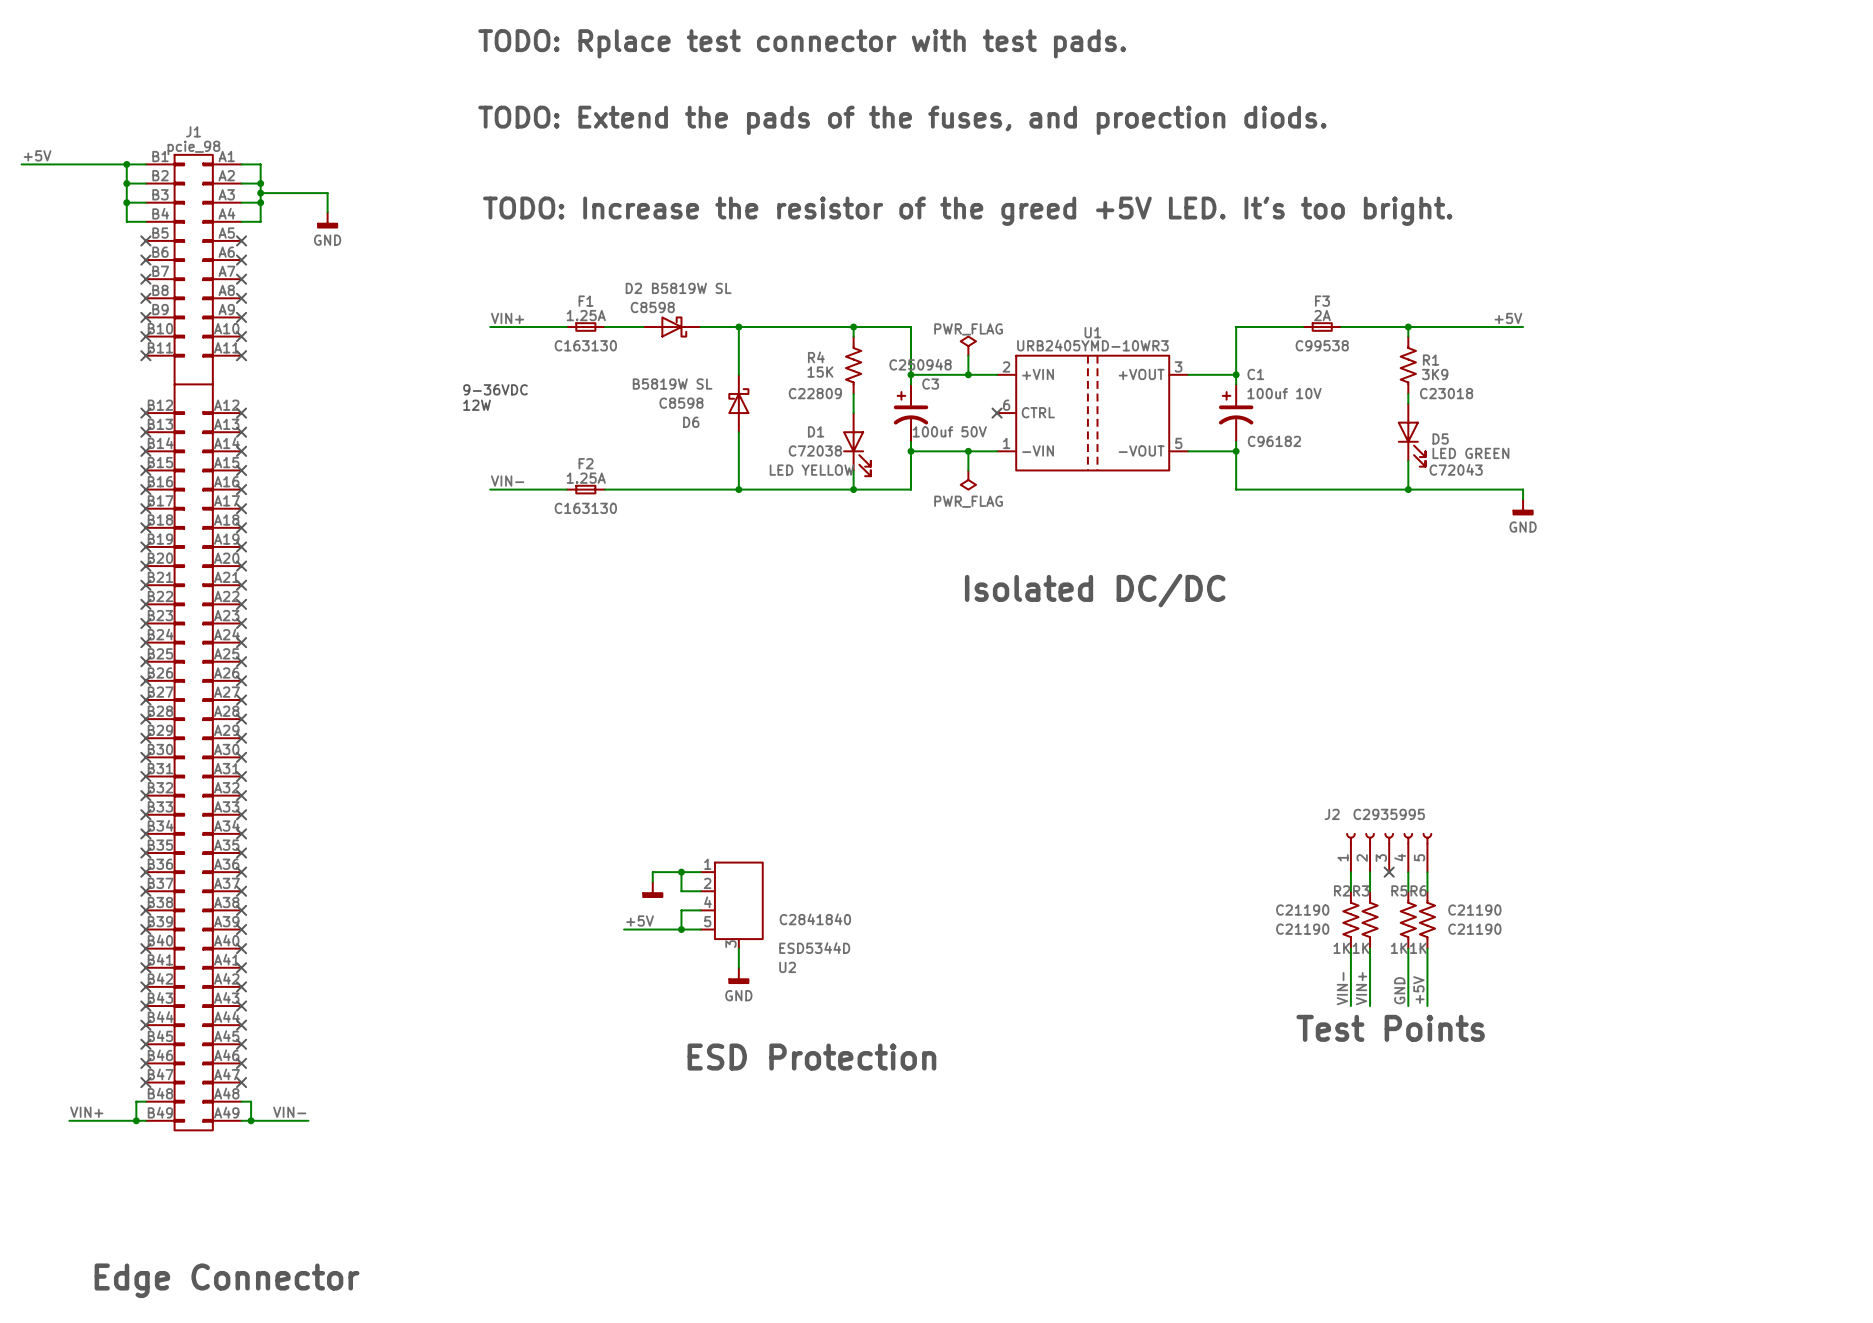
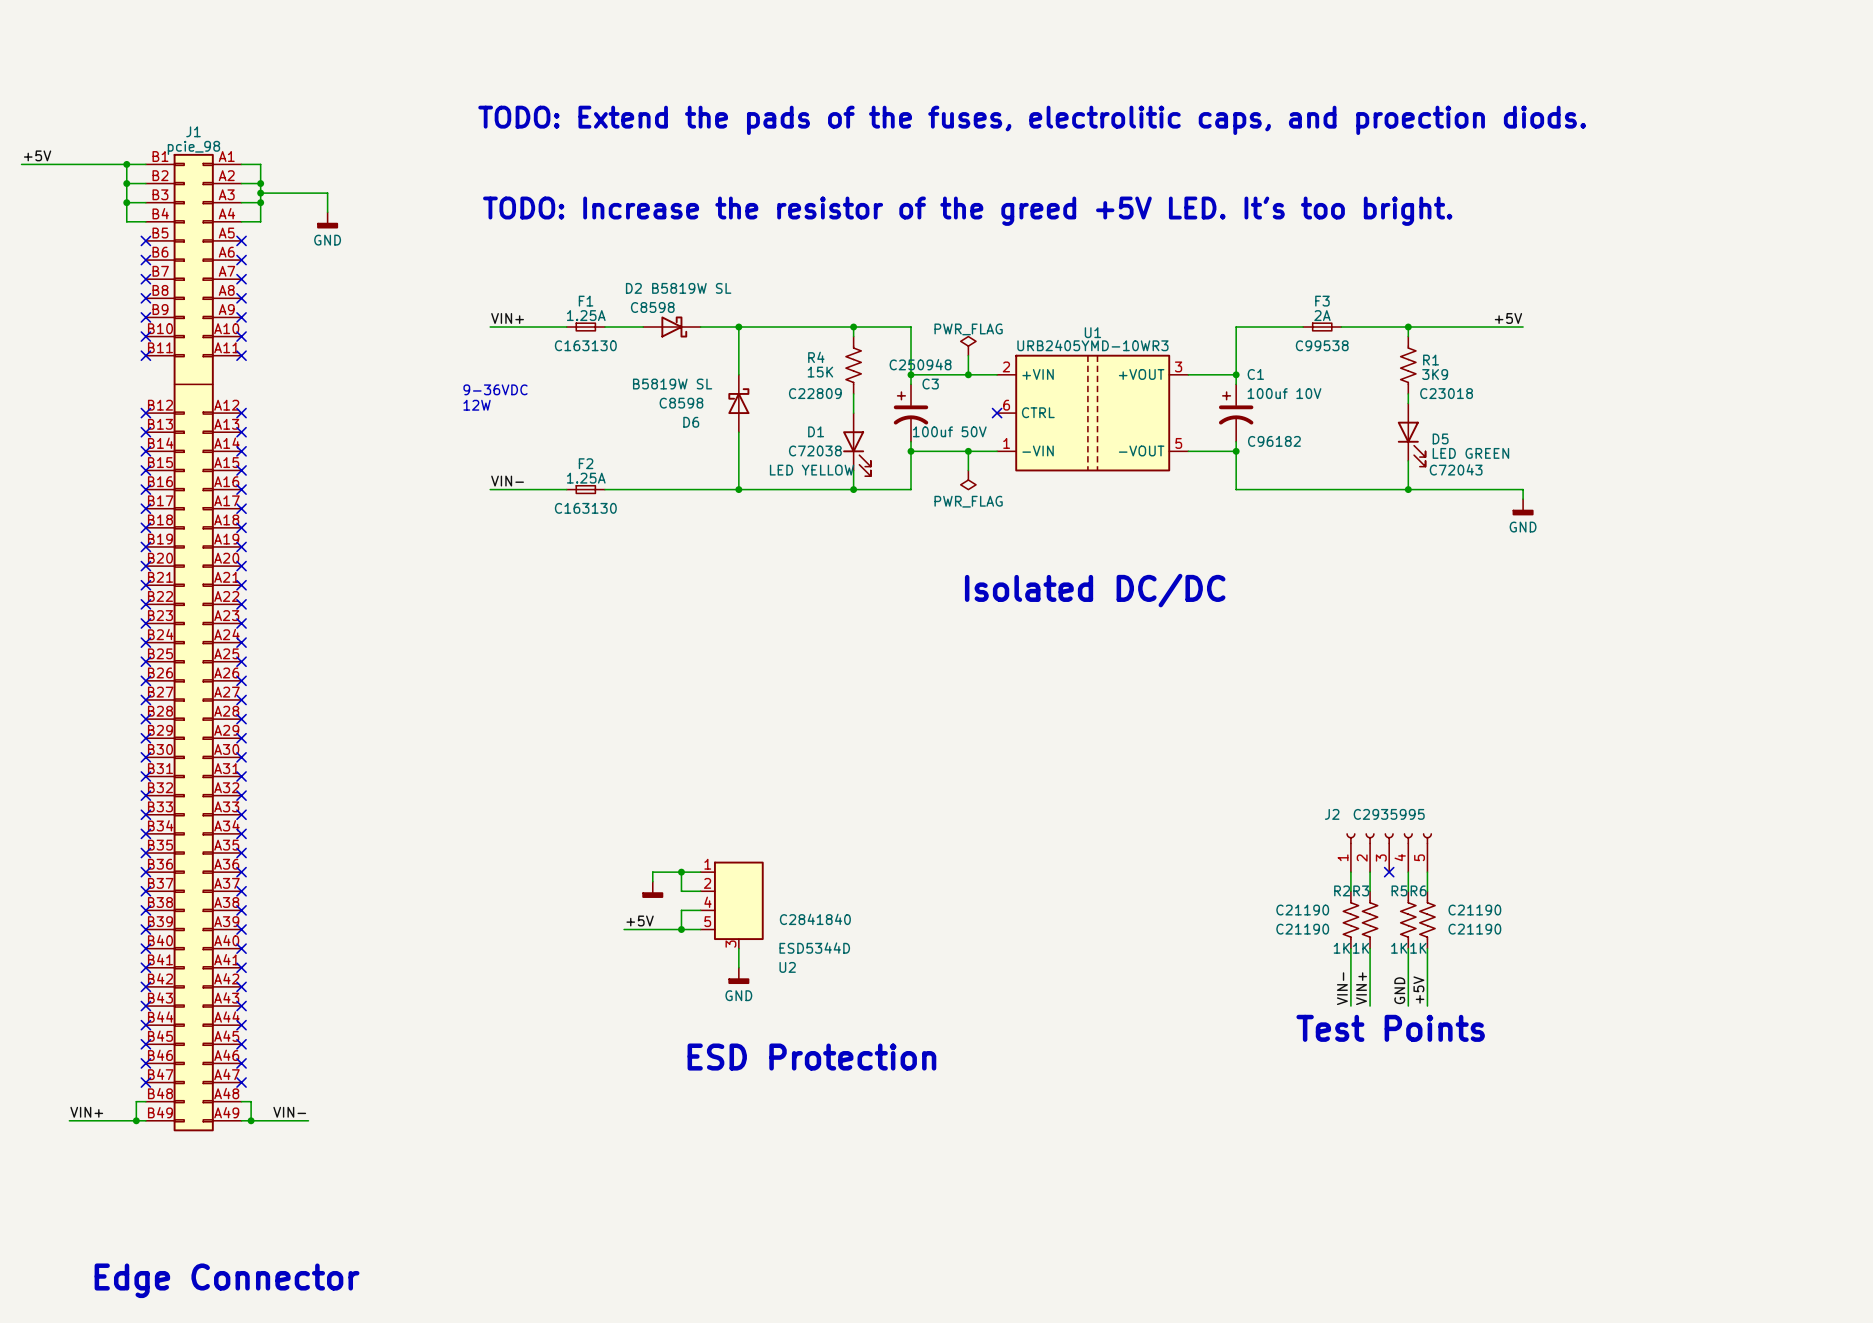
text: TODO: Rplace test connector with test pads. (802, 43) -> none
text: TODO: Extend the pads of the fuses, and proection diods. (902, 120) -> TODO: Extend the pads of the fuses, electrolitic caps, and proection diods. (1032, 120)

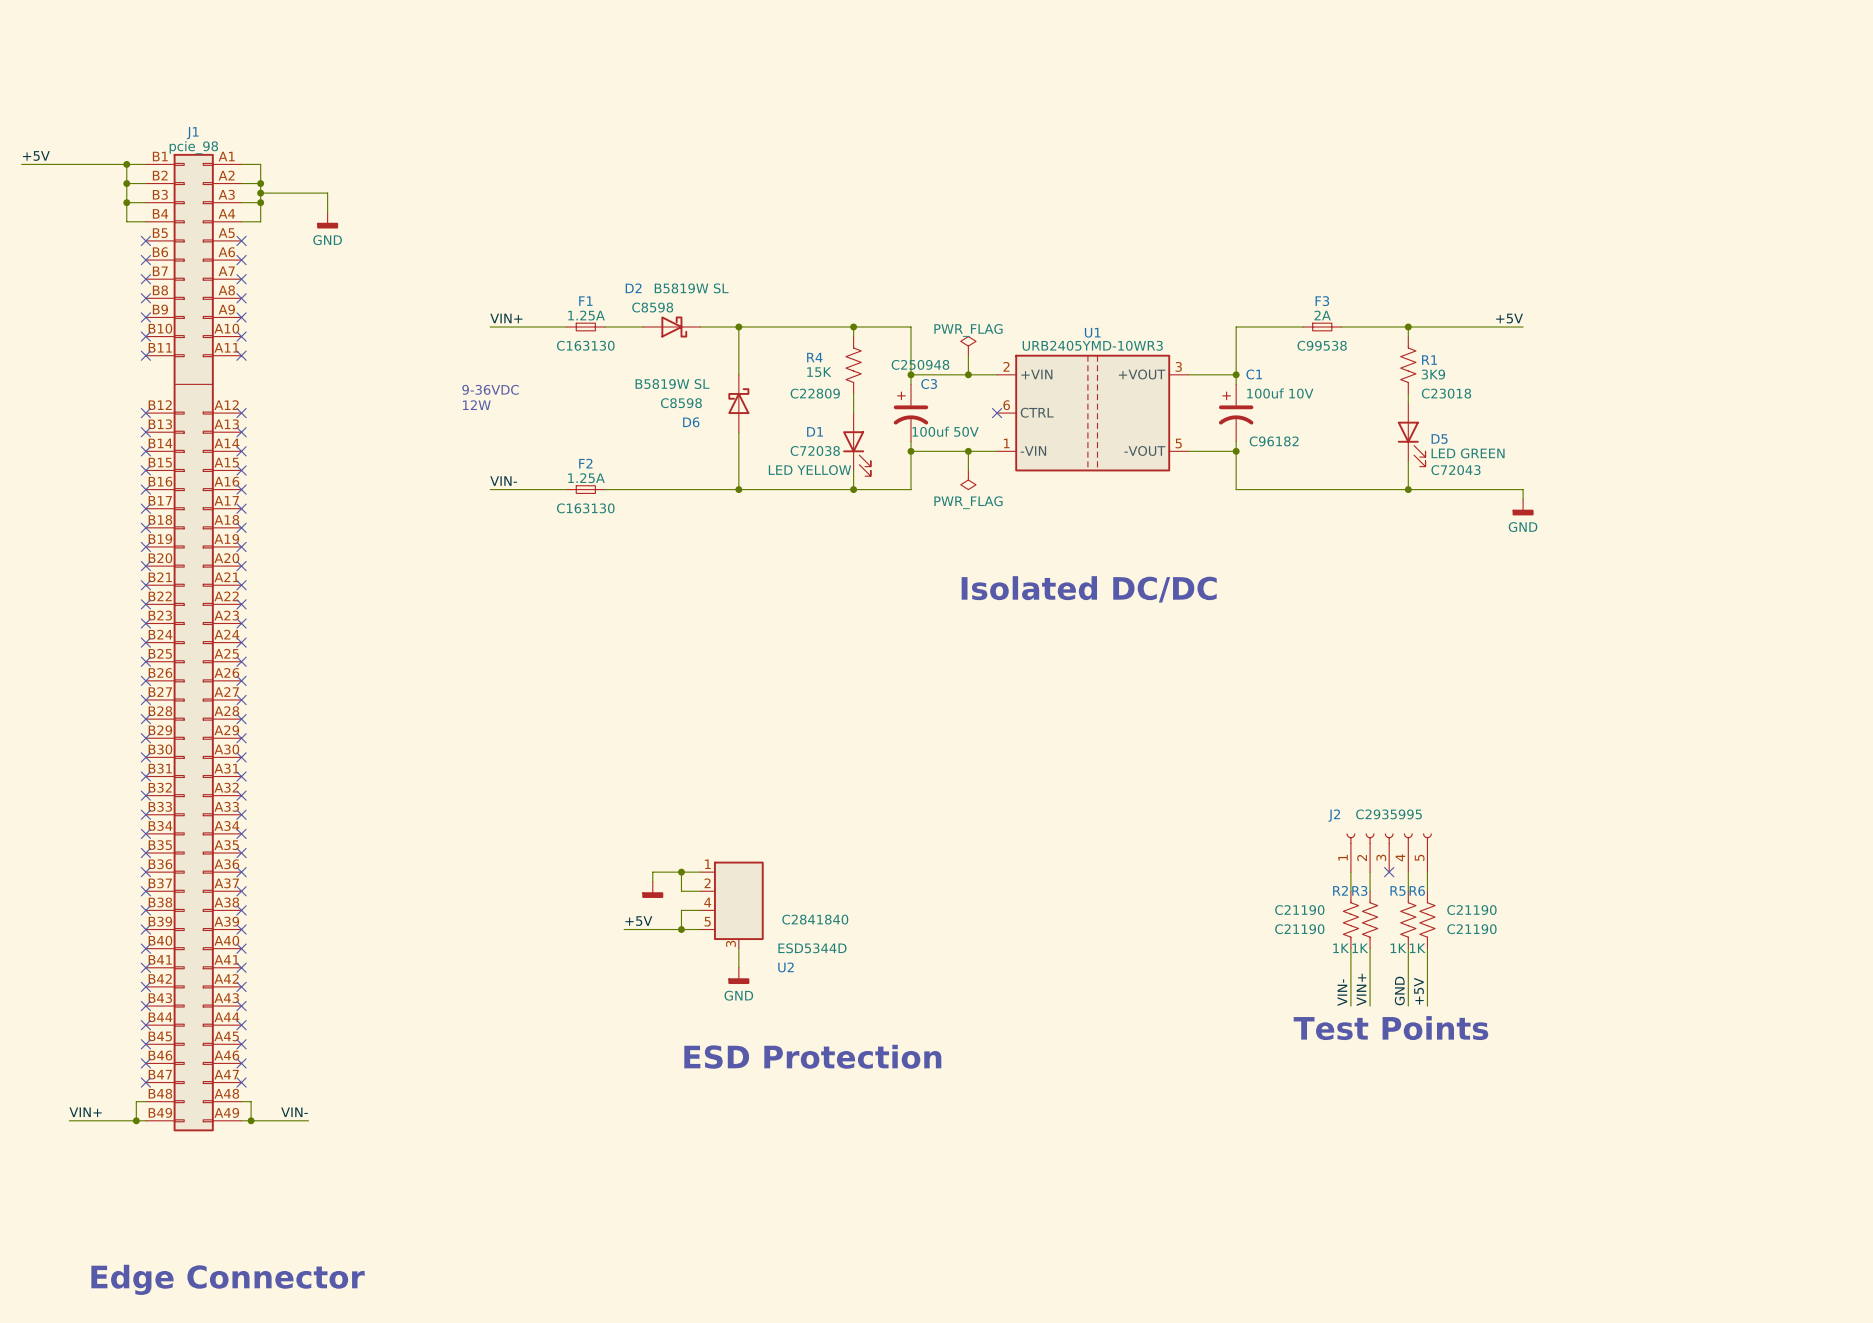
text: TODO: Extend the pads of the fuses, electrolitic caps, and proection diods. (1032, 120) -> none
text: TODO: Increase the resistor of the greed +5V LED. It's too bright. (967, 211) -> none

